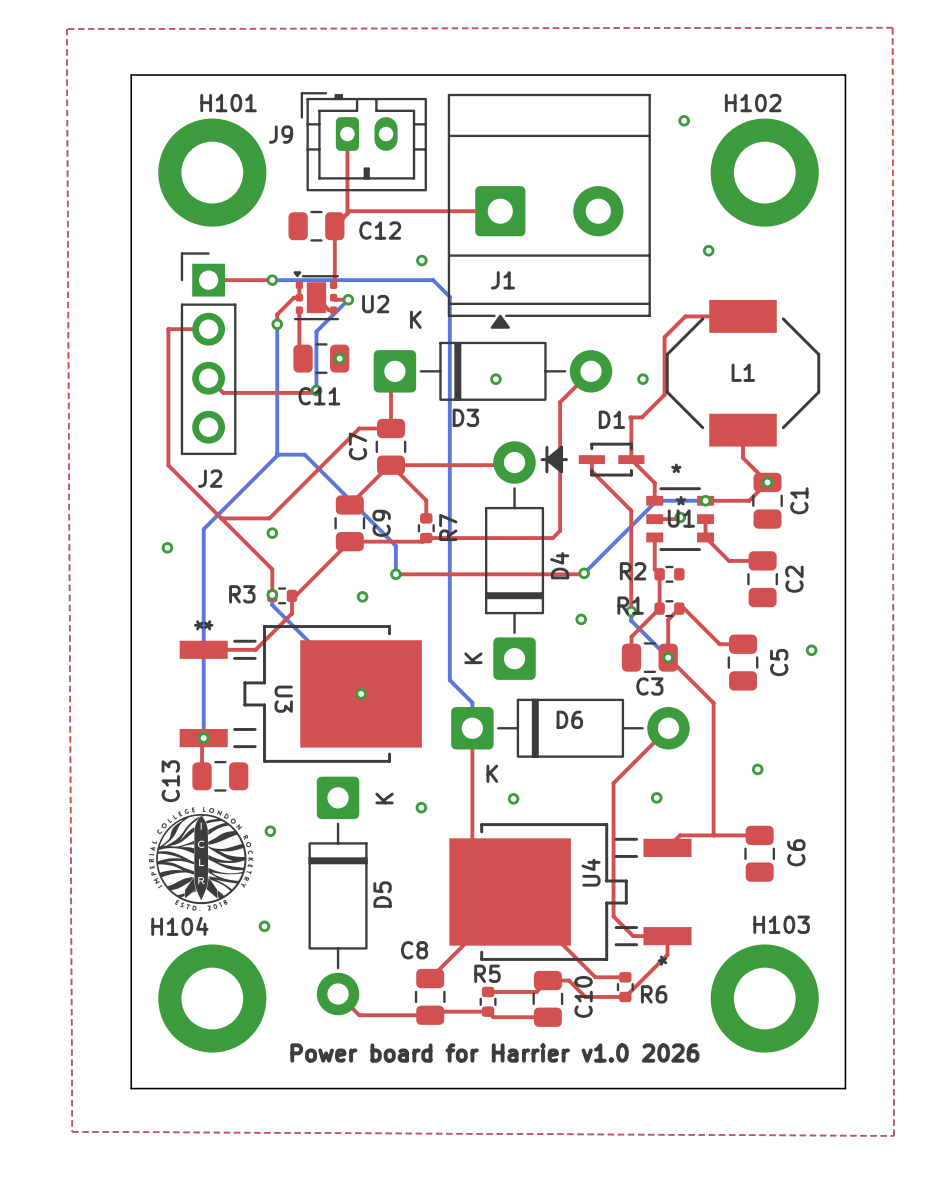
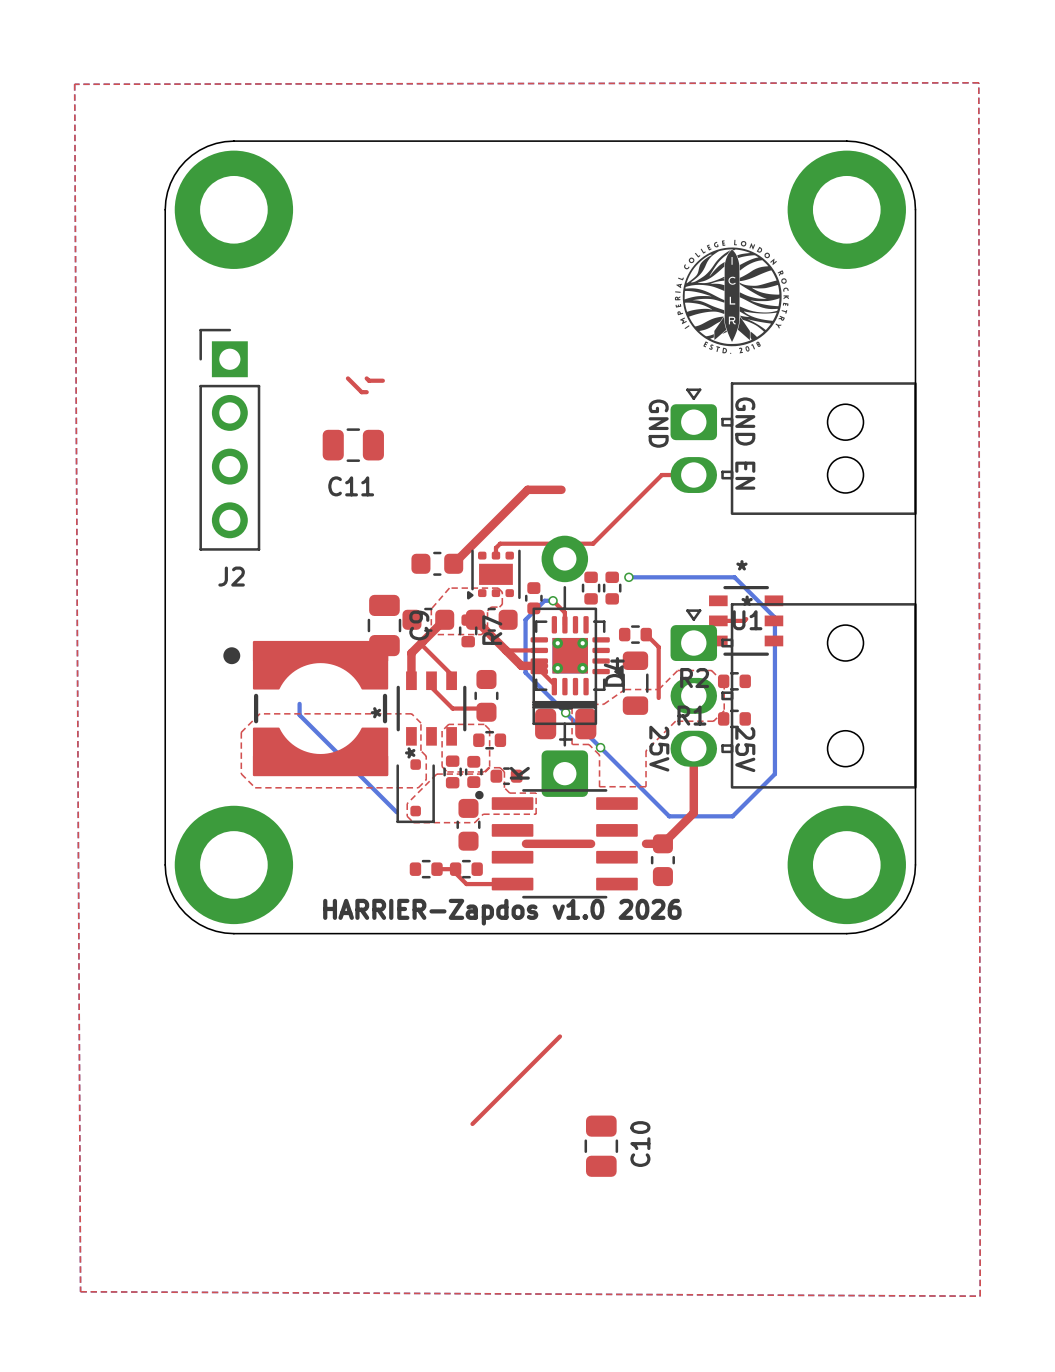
board edge: (131, 75) (845, 75) (845, 1088) (131, 1088) (131, 75) -> (233, 141) (207, 146) (185, 161) (174, 175) (165, 200) (165, 864) (170, 891) (179, 906) (192, 919) (207, 928) (233, 933) (846, 933) (873, 928) (888, 919) (906, 899) (913, 882) (915, 864) (915, 209) (910, 183) (901, 167) (888, 155) (873, 146) (846, 141) (233, 141)
via: (684, 120) -> none
top track: (347, 133) (347, 213) -> none
J9: (363, 141) -> none
part: none -> (233, 209)
part: none -> (846, 209)
drawing: none -> [674, 239, 790, 354]
H101: (212, 172) -> none
H102: (764, 172) -> none
top track: (500, 211) (349, 211) (334, 226) (333, 285) -> none
J1: (549, 211) -> none
C12: (316, 226) -> none
via: (708, 250) -> none
via: (421, 260) -> none
top track: (208, 280) (272, 280) -> none
bottom track: (272, 280) (433, 280) (449, 296) (449, 680) (472, 702) (472, 728) -> none
via: (272, 280) -> none
top track: (299, 285) (299, 297) (294, 297) (277, 314) (277, 324) -> none
U2: (316, 295) -> none
bottom track: (348, 299) (316, 331) (316, 390) -> none
via: (348, 299) -> none
top track: (299, 310) (299, 354) (303, 358) -> none
top track: (743, 316) (685, 316) (664, 337) (664, 394) (642, 417) (630, 417) (631, 459) (654, 483) (654, 500) -> none
bottom track: (277, 324) (278, 454) -> none
via: (277, 324) -> none
top track: (208, 329) (168, 329) (168, 465) (272, 569) (272, 595) -> none
text: none -> GND (745, 421)
text: none -> GND (658, 423)
via: (339, 358) -> none
part: none -> (793, 448)
top track: (394, 371) (390, 375) (390, 428) (359, 428) (269, 518) (221, 518) -> none
D3: (492, 371) -> none
top track: (591, 371) (560, 402) (560, 530) (552, 538) (426, 538) (422, 541) (349, 541) (295, 595) (291, 595) (291, 613) (255, 649) (203, 649) -> none
L1: (743, 373) -> none
top track: (208, 378) (223, 392) (314, 392) (316, 390) -> none
via: (495, 379) -> none
via: (642, 379) -> none
top track: none -> (693, 475) (661, 475) (593, 543) (500, 543) (495, 547) (495, 555)
text: none -> EN (745, 475)
via: (316, 390) -> none
top track: none -> (561, 489) (527, 489) (453, 563)
top track: (743, 430) (743, 457) (767, 482) (749, 500) (705, 500) -> none
C7: (390, 446) -> none
bottom track: (278, 454) (203, 529) (203, 738) -> none
bottom track: (278, 454) (304, 454) (395, 545) (395, 574) -> none
top track: (591, 459) (591, 471) (631, 510) (631, 611) -> none
D1: (592, 459) -> none
top track: (514, 462) (511, 465) (389, 465) (349, 504) -> none
top track: (390, 465) (426, 500) (426, 518) -> none
part: none -> (437, 563)
part: none -> (493, 574)
bottom track: none -> (628, 577) (734, 577) (774, 617) (774, 774) (732, 816) (669, 816) (525, 672) (525, 619) (544, 600) (553, 600)
via: none -> (628, 577)
via: (767, 482) -> none
top zone outline: none -> (449, 588) (498, 588) (502, 592) (502, 604) (499, 607) (491, 607) (487, 610) (487, 628) (481, 634) (437, 634) (431, 628) (431, 609) (449, 588)
part: none -> (591, 588)
part: none -> (612, 588)
part: none -> (533, 598)
top track: none -> (553, 600) (564, 612) (564, 624)
via: none -> (553, 600)
bottom track: (705, 500) (656, 500) (584, 573) -> none
via: (705, 500) -> none
C1: (767, 500) -> none
via: (680, 517) -> none
part: none -> (428, 619)
top track: none -> (444, 619) (411, 653) (411, 680)
top track: none -> (475, 619) (521, 665) (543, 665)
part: none -> (491, 619)
top track: (705, 519) (705, 537) (728, 560) (762, 560) -> none
part: none -> (635, 634)
top track: none -> (646, 634) (658, 647) (658, 697)
via: (272, 533) -> none
top track: (654, 537) (654, 569) (659, 574) (659, 608) (631, 636) (631, 657) -> none
top track: none -> (422, 641) (422, 645) (451, 674) (451, 680)
top track: none -> (506, 650) (539, 650)
via: (167, 547) -> none
part: none -> (577, 655)
top zone outline: none -> (677, 670) (658, 689) (624, 689) (603, 704) (572, 704) (572, 744) (588, 744) (599, 755) (599, 786) (646, 786) (646, 750) (675, 721) (713, 721) (724, 710) (724, 683) (711, 670) (677, 670)
top track: none -> (539, 671) (554, 686)
top track: none -> (431, 680) (431, 687) (452, 708) (484, 708)
top track: (584, 573) (395, 574) -> none
via: (584, 573) -> none
via: (395, 574) -> none
part: none -> (635, 683)
C2: (762, 579) -> none
part: none -> (486, 695)
part: none -> (793, 695)
via: (272, 594) -> none
R3: (282, 595) -> none
via: (362, 596) -> none
part: none -> (305, 708)
part: none -> (431, 708)
via: none -> (565, 712)
top zone outline: none -> (259, 713) (411, 713) (420, 723) (420, 750) (426, 756) (426, 779) (418, 787) (255, 787) (241, 773) (241, 732) (259, 713)
bottom track: (631, 611) (631, 620) (668, 657) (664, 657) -> none
via: (631, 611) -> none
top zone outline: none -> (448, 724) (484, 724) (489, 729) (489, 766) (484, 771) (447, 771) (442, 766) (442, 731) (448, 724)
part: none -> (565, 723)
via: (581, 619) -> none
part: none -> (489, 740)
via: none -> (600, 747)
text: none -> 25V (659, 748)
top track: none -> (693, 748) (693, 812) (662, 843) (646, 843)
text: none -> 25V (745, 749)
top track: (743, 644) (719, 644) (684, 608) (679, 608) (668, 619) (668, 657) (713, 703) (713, 835) -> none
via: (811, 650) -> none
top zone outline: none -> (489, 767) (500, 767) (504, 771) (504, 787) (509, 793) (536, 793) (536, 814) (483, 814) (474, 822) (413, 822) (407, 816) (407, 803) (436, 774) (483, 774) (489, 767)
part: none -> (452, 771)
part: none -> (473, 771)
C3: (649, 657) -> none
via: (668, 657) -> none
part: none -> (506, 776)
C5: (743, 662) -> none
part: none -> (415, 791)
U3: (300, 693) -> none
via: (361, 693) -> none
part: none -> (468, 824)
top track: none -> (525, 843) (591, 843)
part: none -> (556, 843)
top track: (472, 728) (472, 854) (595, 977) (625, 977) -> none
D6: (570, 728) -> none
top track: (668, 728) (613, 783) (613, 916) (633, 936) (667, 936) (667, 954) (625, 996) (585, 996) (568, 980) (547, 980) (536, 991) (488, 991) -> none
part: none -> (662, 860)
via: (203, 738) -> none
part: none -> (233, 864)
part: none -> (846, 864)
part: none -> (426, 869)
top track: none -> (437, 869) (455, 869) (455, 873) (466, 884) (512, 884) (515, 886)
part: none -> (466, 869)
via: (757, 769) -> none
C13: (220, 776) -> none
text: none -> HARRIER-Zapdos v1.0 2026 (502, 912)
via: (656, 797) -> none
via: (513, 798) -> none
drawing: [149, 806, 254, 912] -> none
via: (421, 807) -> none
via: (270, 831) -> none
top track: (759, 835) (679, 835) (667, 847) -> none
C6: (759, 853) -> none
U4: (570, 892) -> none
D5: (338, 895) -> none
via: (264, 926) -> none
R6: (625, 987) -> none
top track: (338, 993) (359, 1015) (430, 1015) (433, 1011) (488, 1011) (493, 1017) (547, 1017) -> none
C8: (430, 996) -> none
H104: (212, 998) -> none
H103: (764, 998) -> none
R5: (488, 1001) -> none
text: Power board for Harrier v1.0 2026 (494, 1053) -> none

